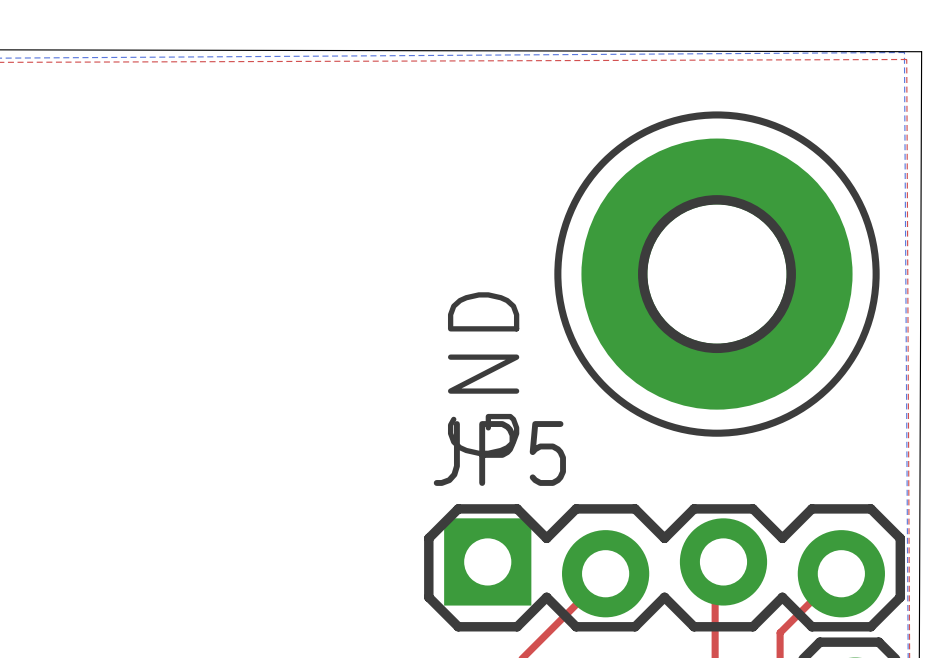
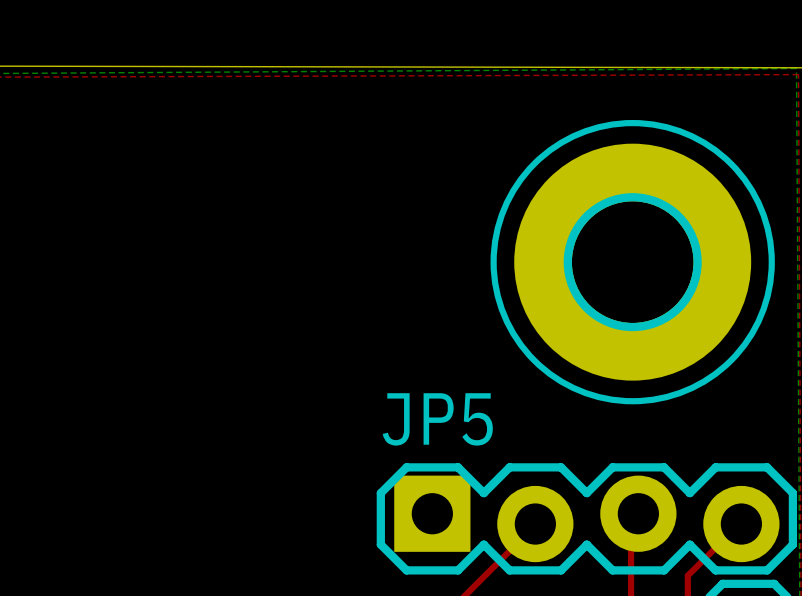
text: GND (483, 374) -> none

